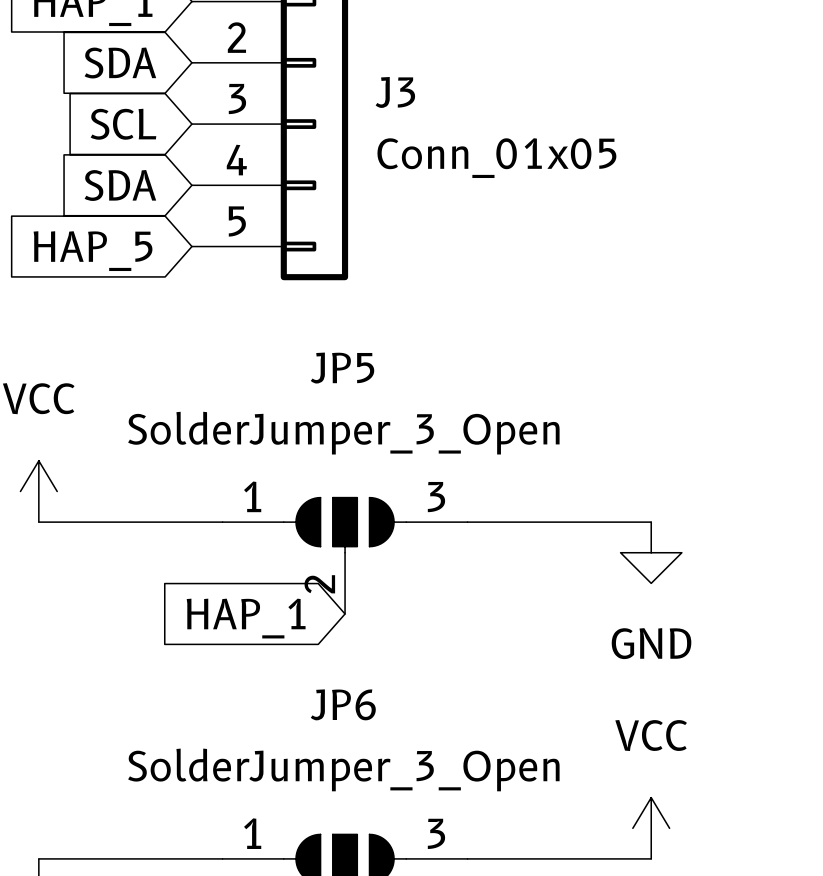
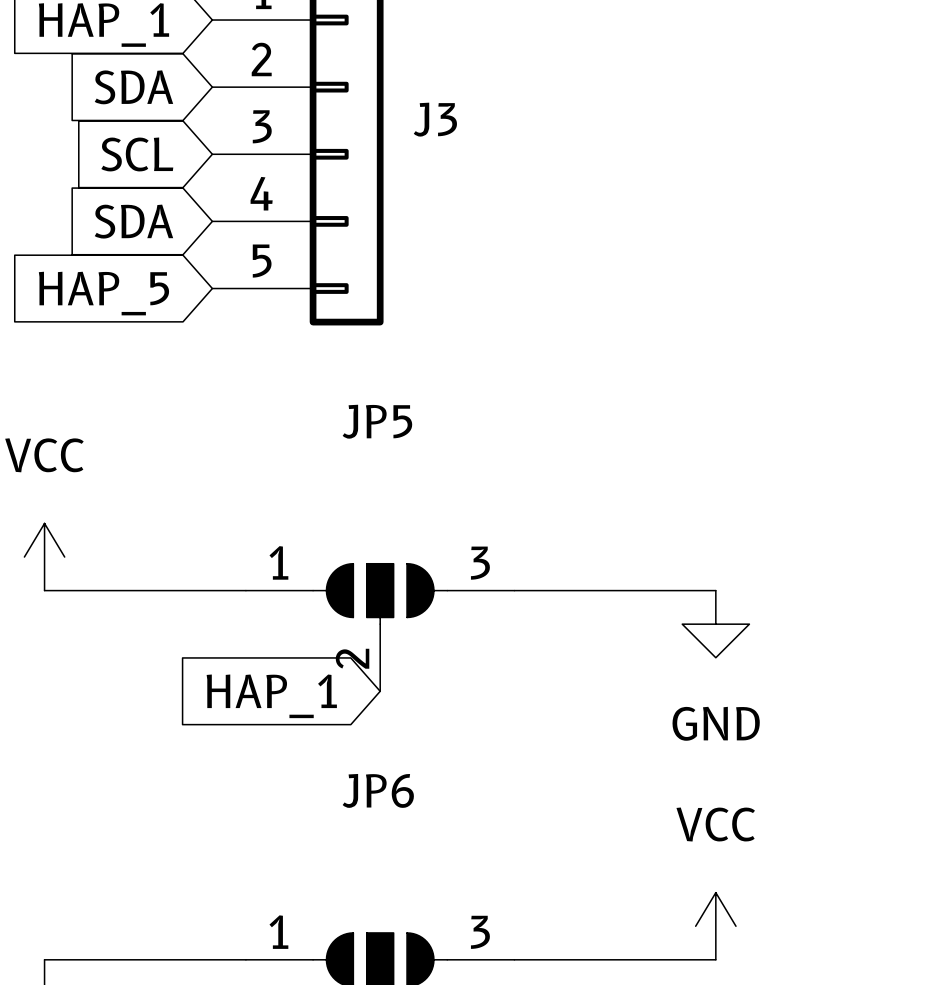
J3 value: Conn_01x05 (496, 158) -> none
JP5 value: SolderJumper_3_Open (343, 433) -> none
JP6 value: SolderJumper_3_Open (343, 769) -> none

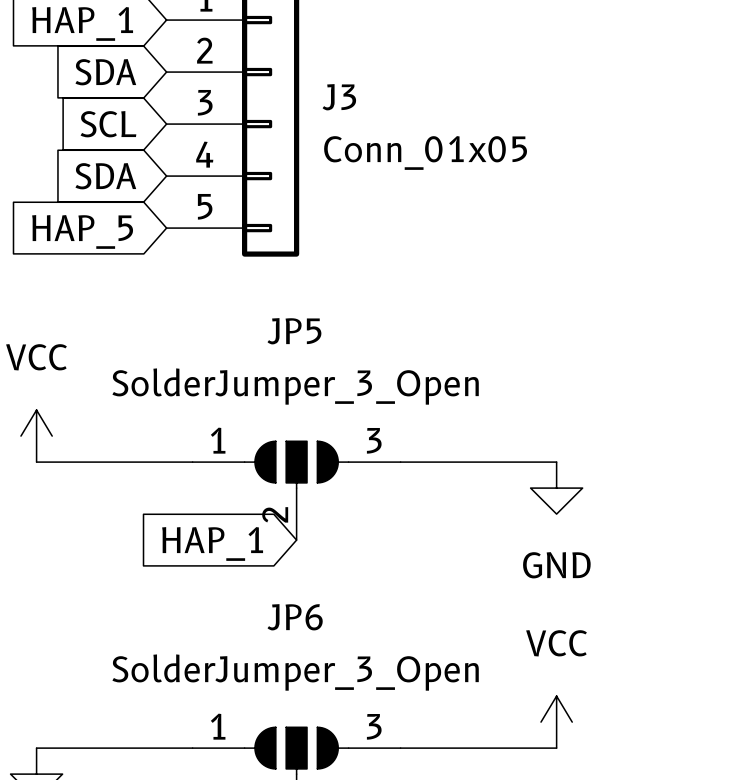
J3 value: none -> Conn_01x05 (425, 152)
JP5 value: none -> SolderJumper_3_Open (295, 386)
JP6 value: none -> SolderJumper_3_Open (295, 672)

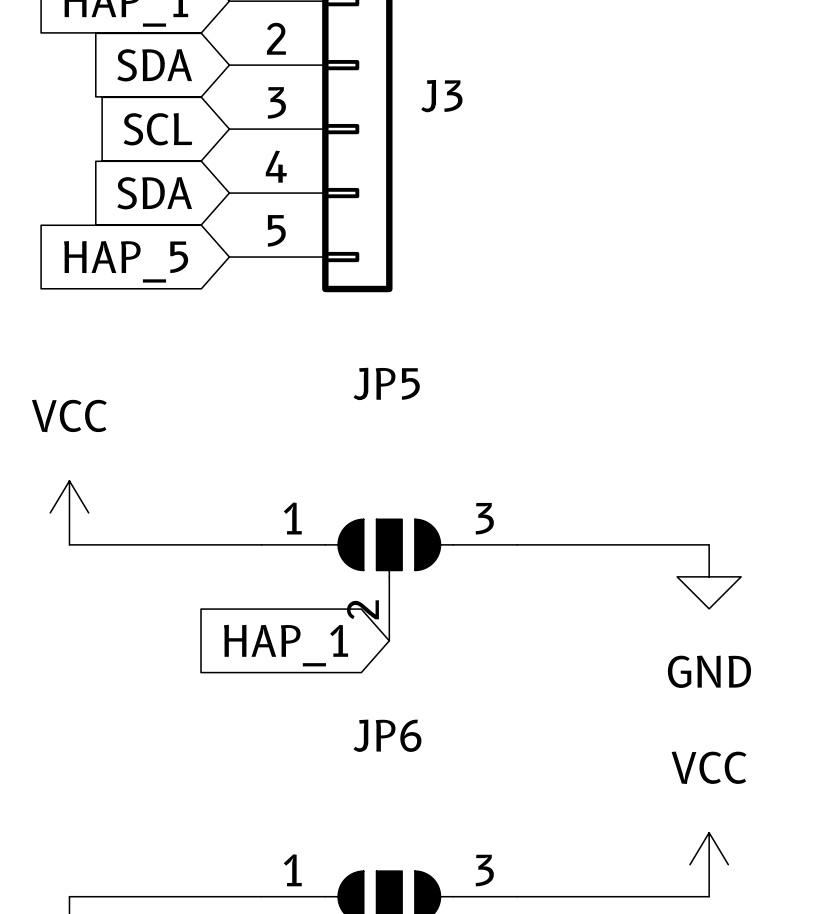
J3 value: Conn_01x05 (425, 152) -> none
JP5 value: SolderJumper_3_Open (295, 386) -> none
JP6 value: SolderJumper_3_Open (295, 672) -> none

